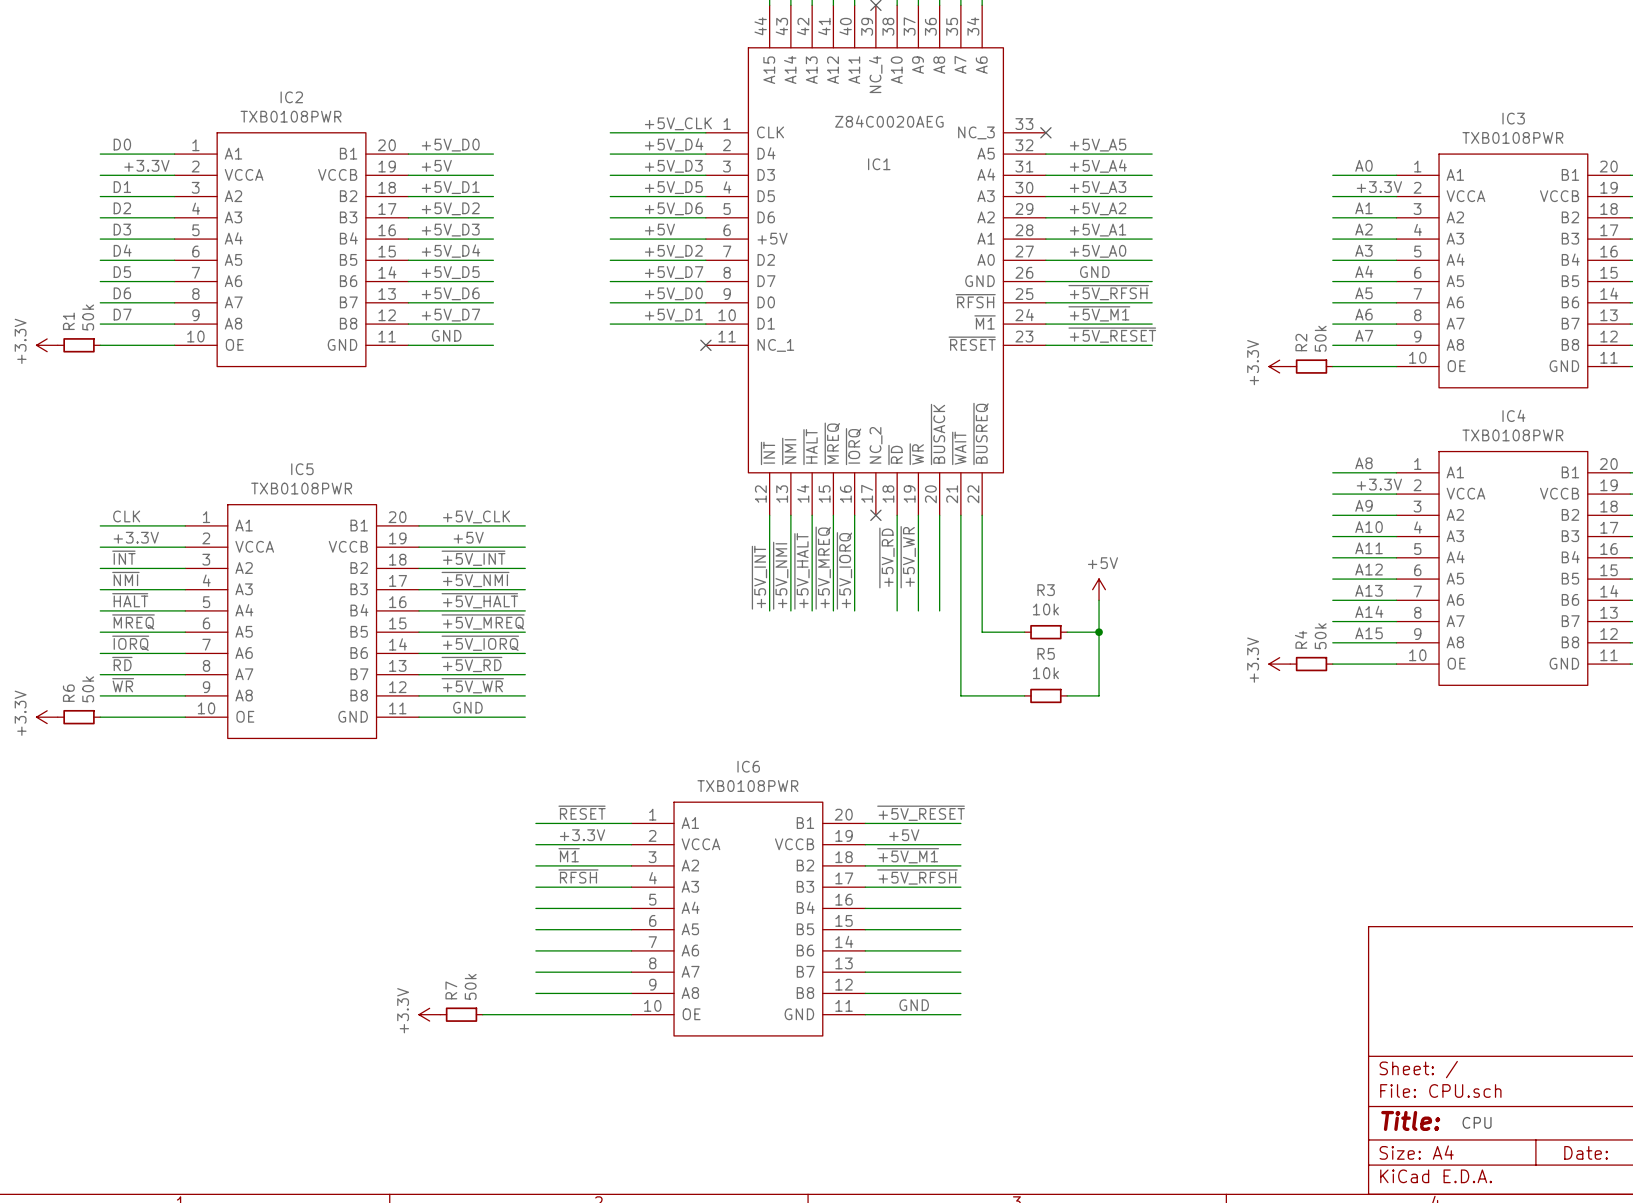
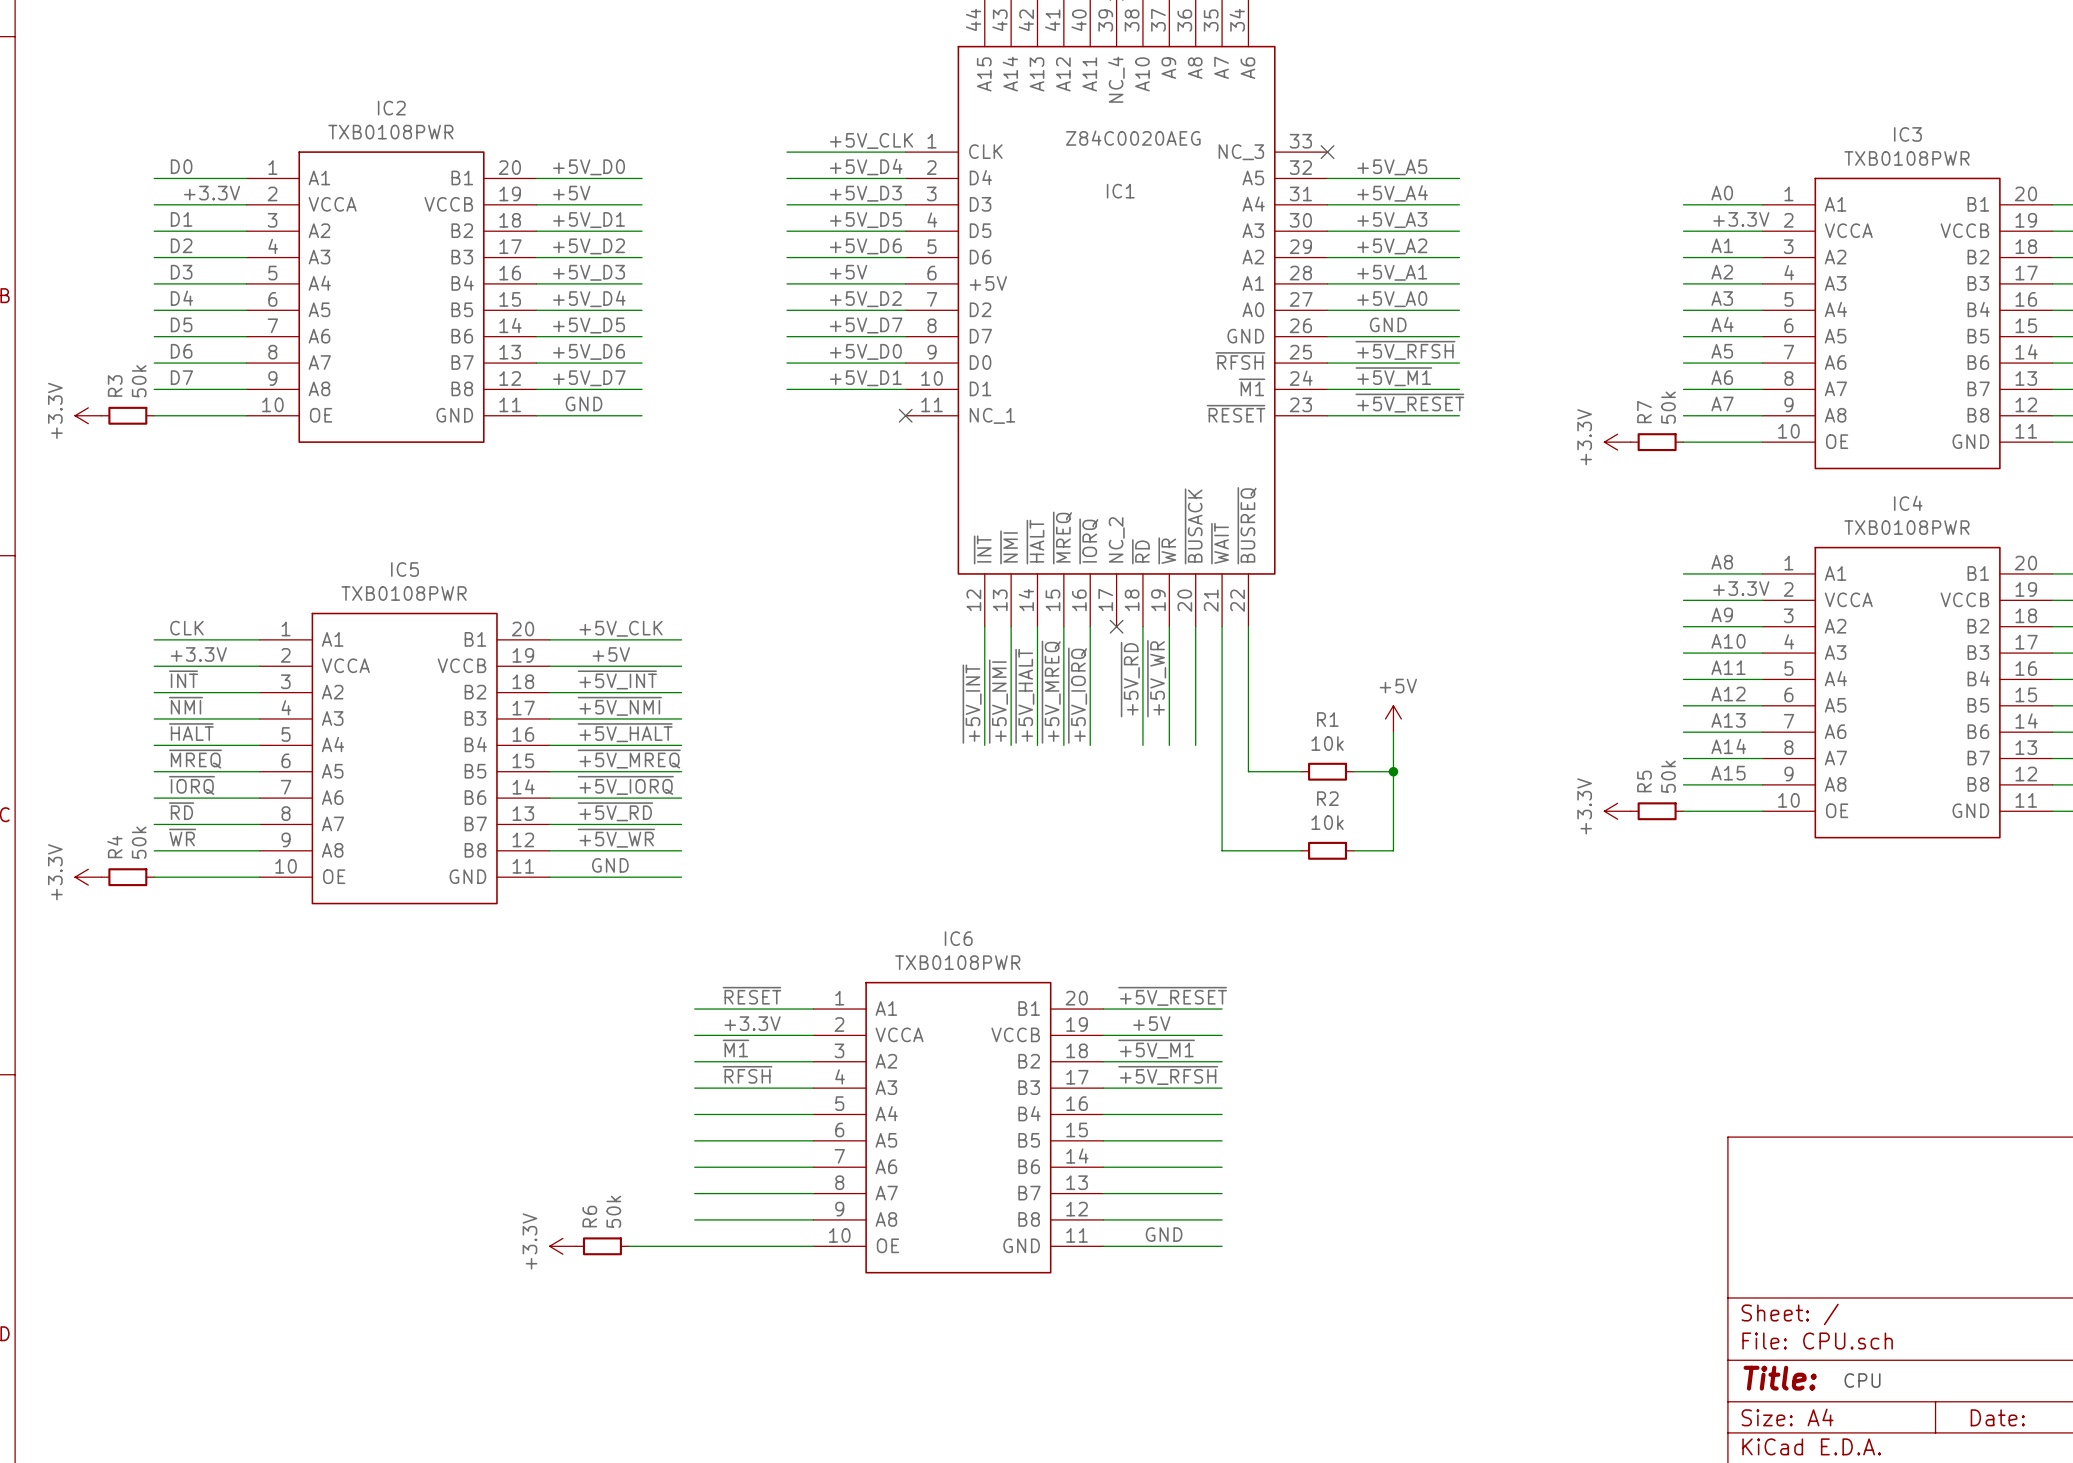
R1 name: R1 (68, 321) -> R3 (115, 385)
R2 name: R2 (1301, 342) -> R7 (1644, 412)
R3 name: R3 (1046, 590) -> R1 (1327, 719)
R4 name: R4 (1301, 639) -> R5 (1644, 781)
R5 name: R5 (1046, 653) -> R2 (1327, 798)
R6 name: R6 (68, 693) -> R4 (114, 847)
R7 name: R7 (451, 990) -> R6 (589, 1216)

